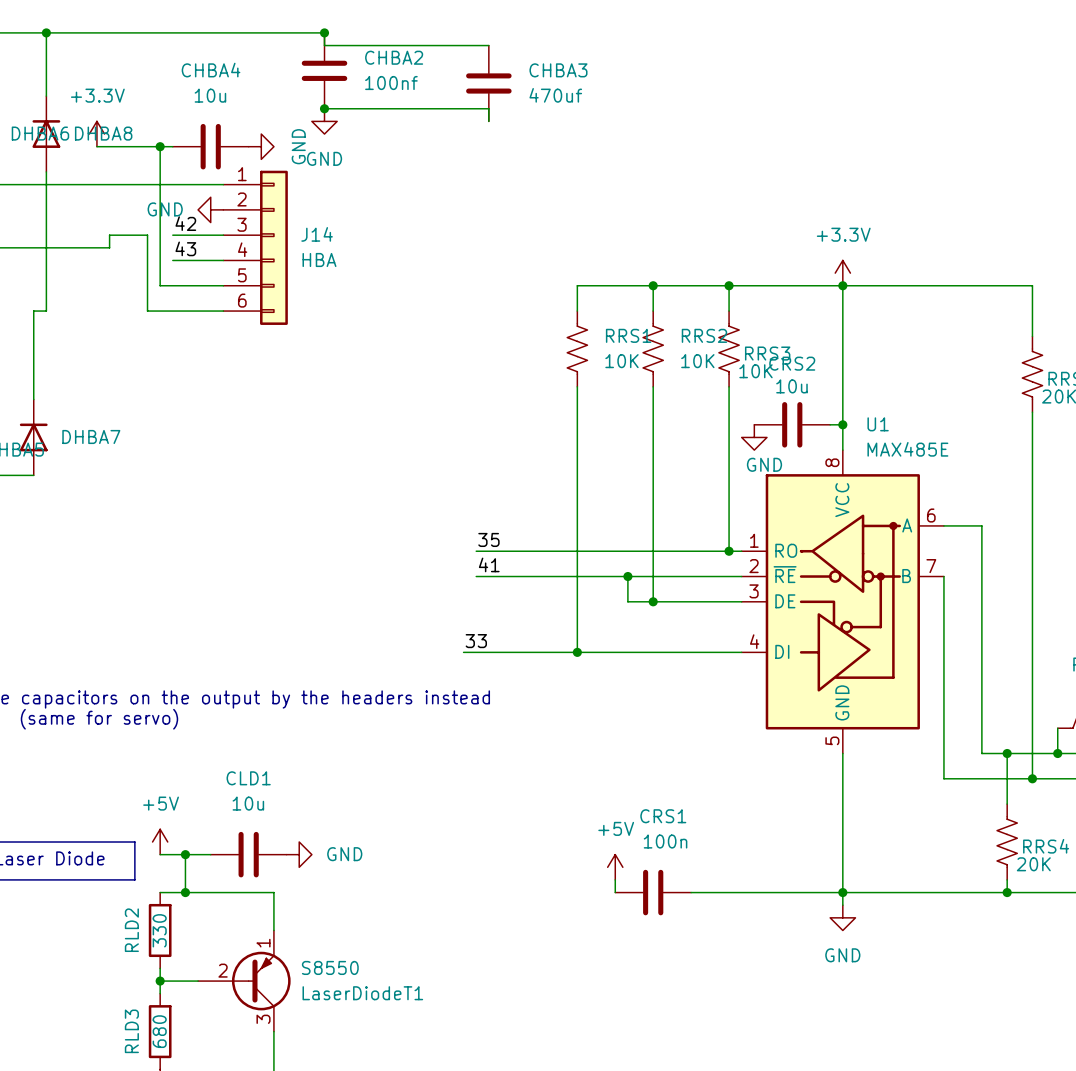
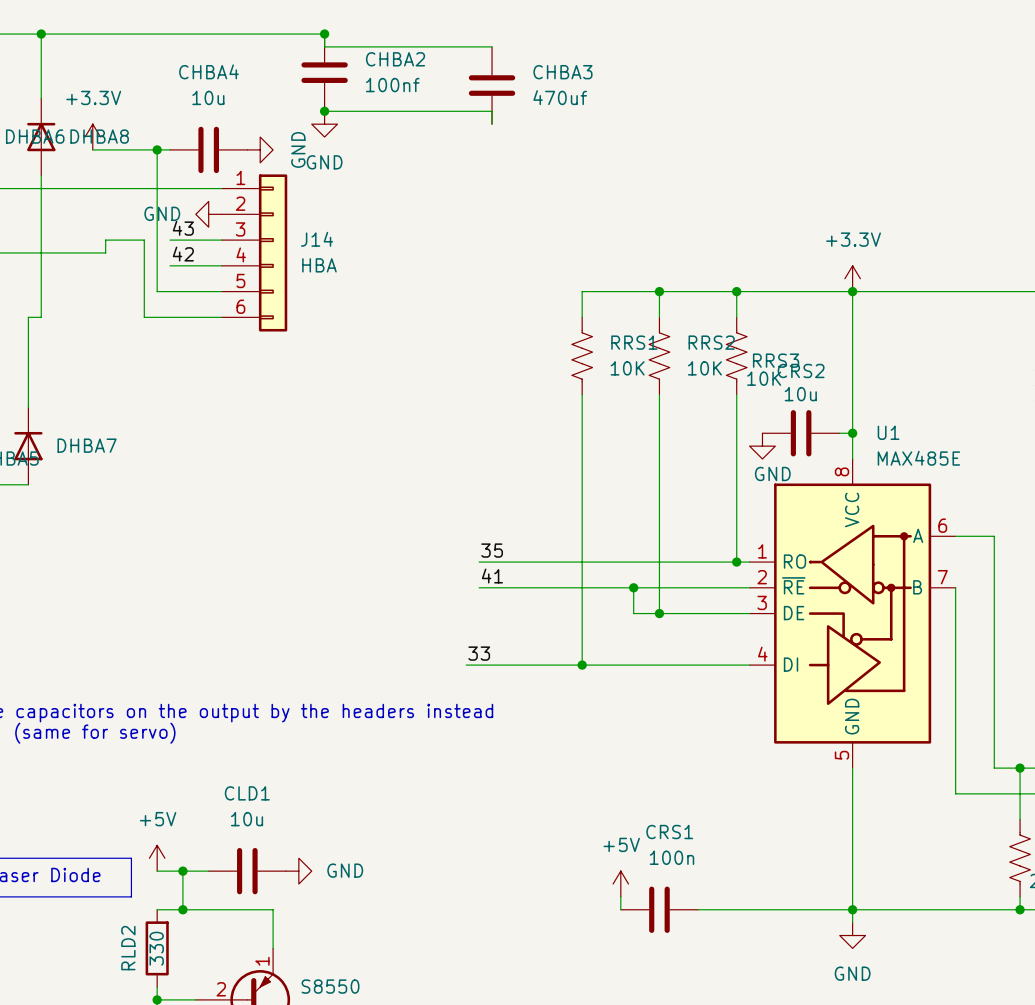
label: 42 (185, 223) -> 43 (183, 228)
label: 43 (185, 248) -> 42 (183, 254)

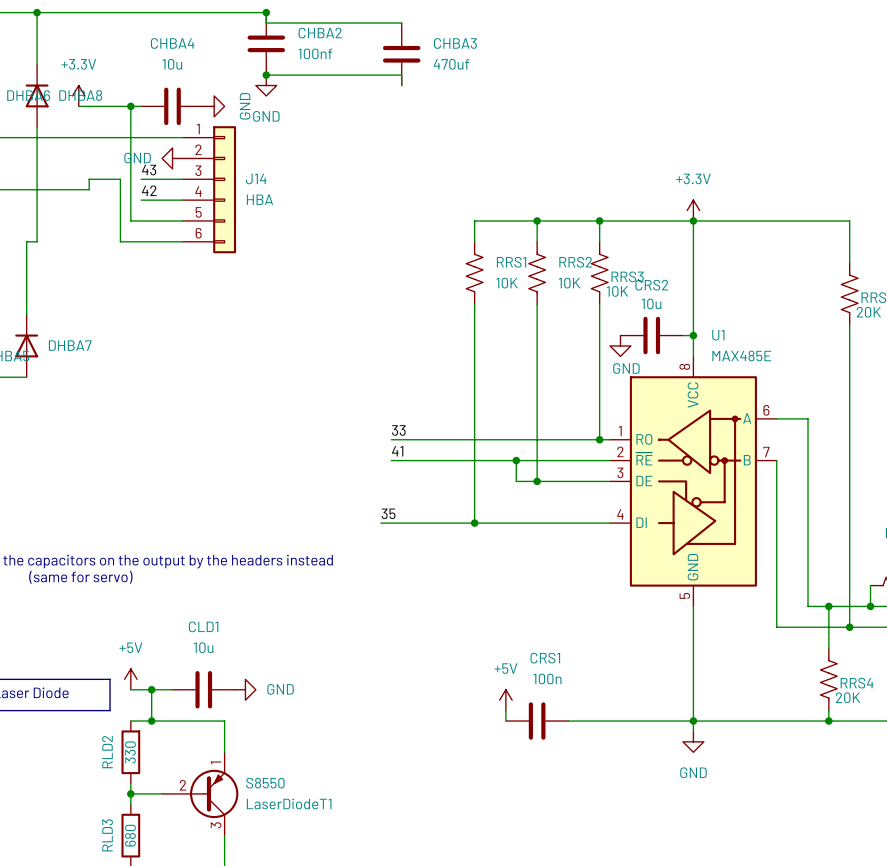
label: 35 (492, 550) -> 33 (398, 430)
label: 33 (479, 653) -> 35 (388, 513)

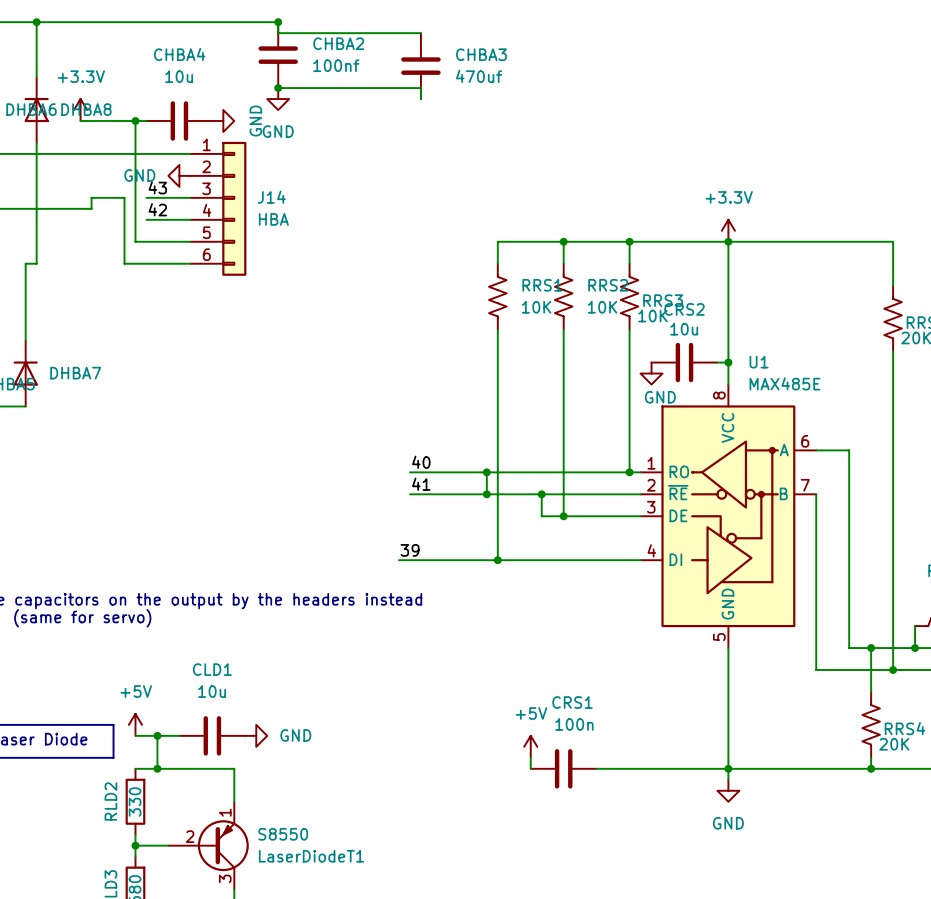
label: 33 (398, 430) -> 40 (421, 462)
wire: none -> (486, 472) (486, 494)
junction: none -> (486, 472)
junction: none -> (486, 494)
label: 35 (388, 513) -> 39 (410, 550)

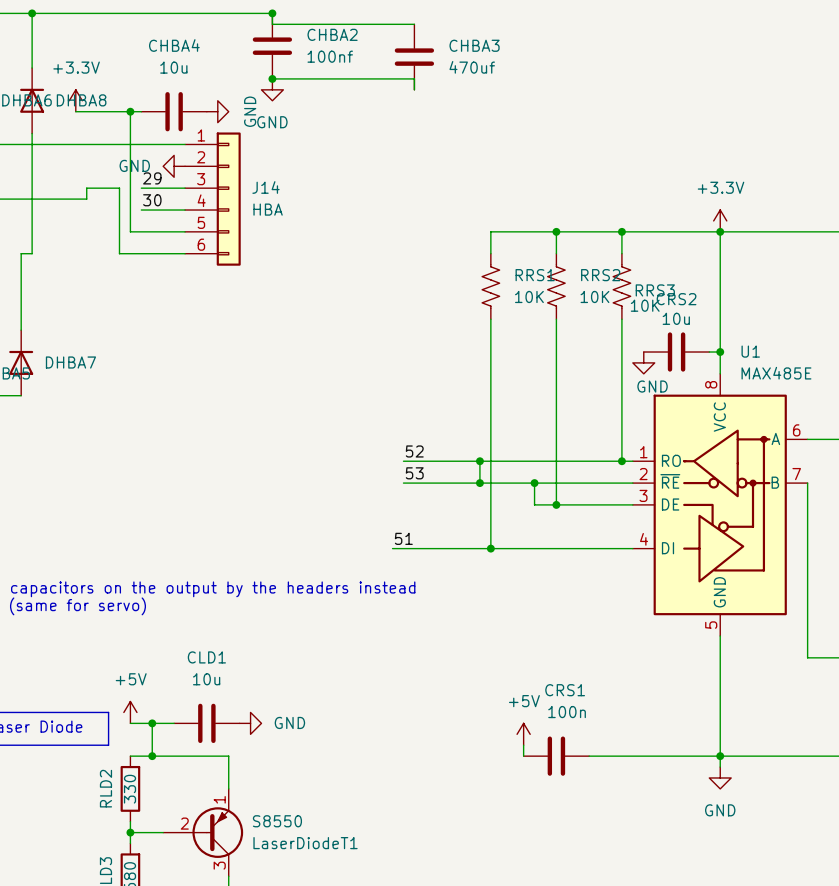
label: 43 (157, 187) -> 29 (152, 178)
label: 42 (157, 209) -> 30 (152, 200)
label: 40 (421, 462) -> 52 (414, 451)
label: 41 (421, 484) -> 53 (414, 473)
label: 39 (410, 550) -> 51 (403, 538)

